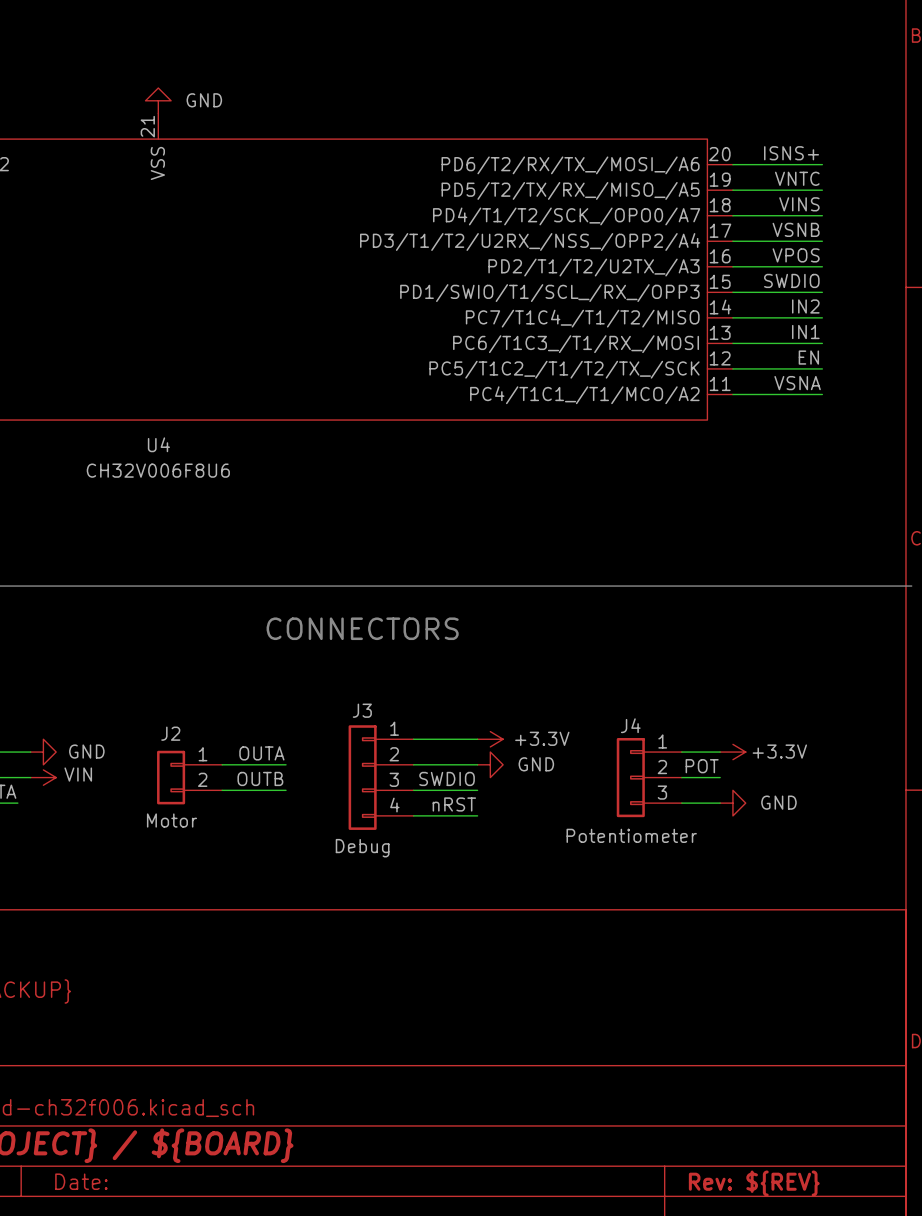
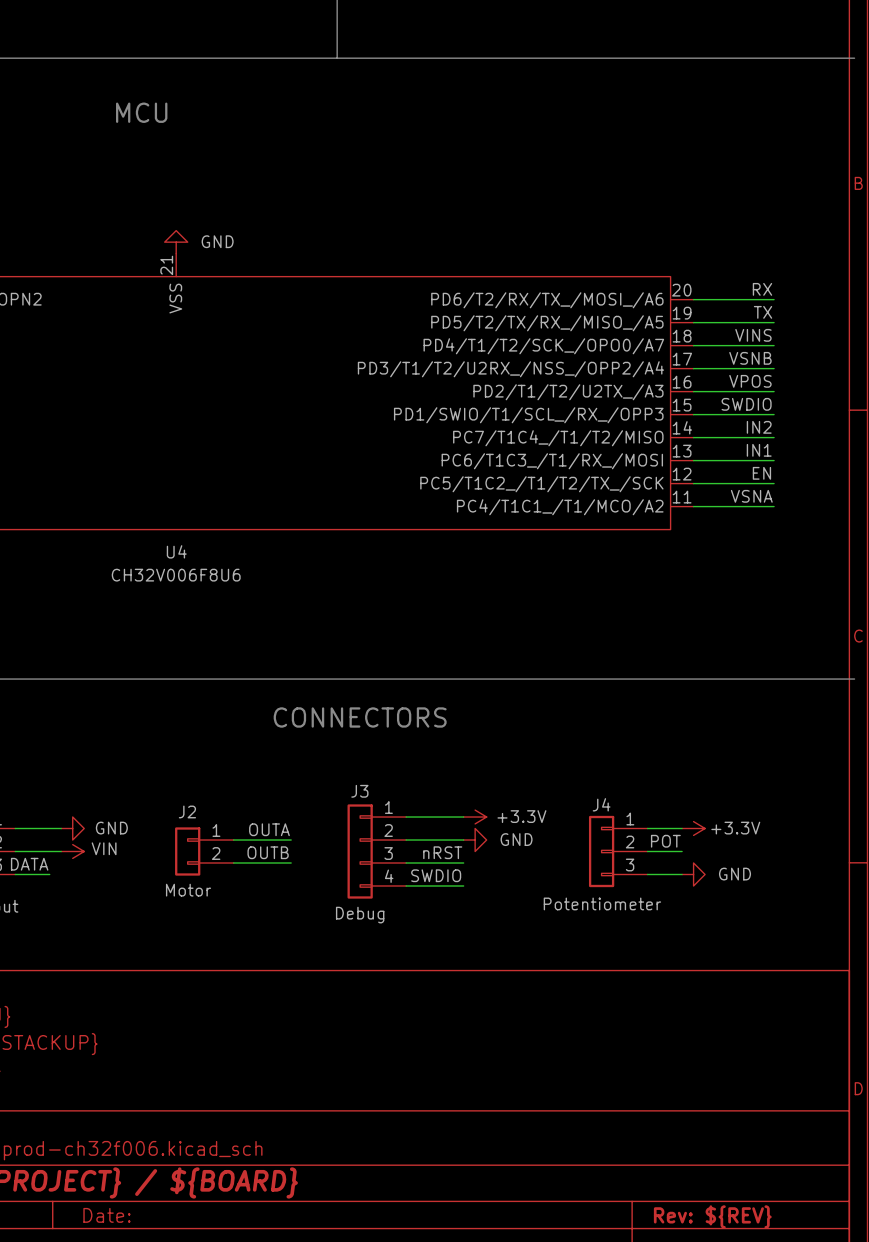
label: ISNS+ (791, 153) -> RX (762, 289)
label: VNTC (797, 178) -> TX (763, 312)
label: SWDIO (447, 778) -> nRST (442, 852)
label: nRST (454, 804) -> SWDIO (436, 875)

